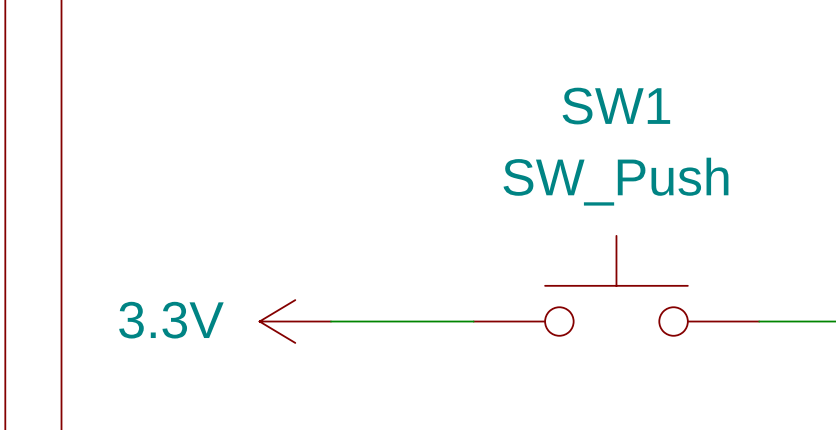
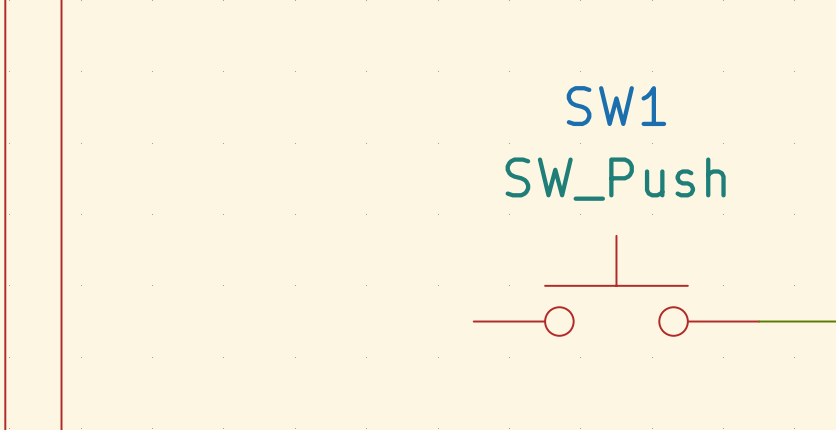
power symbol: 3.3V (295, 321) -> none
wire: (330, 321) (473, 321) -> none

